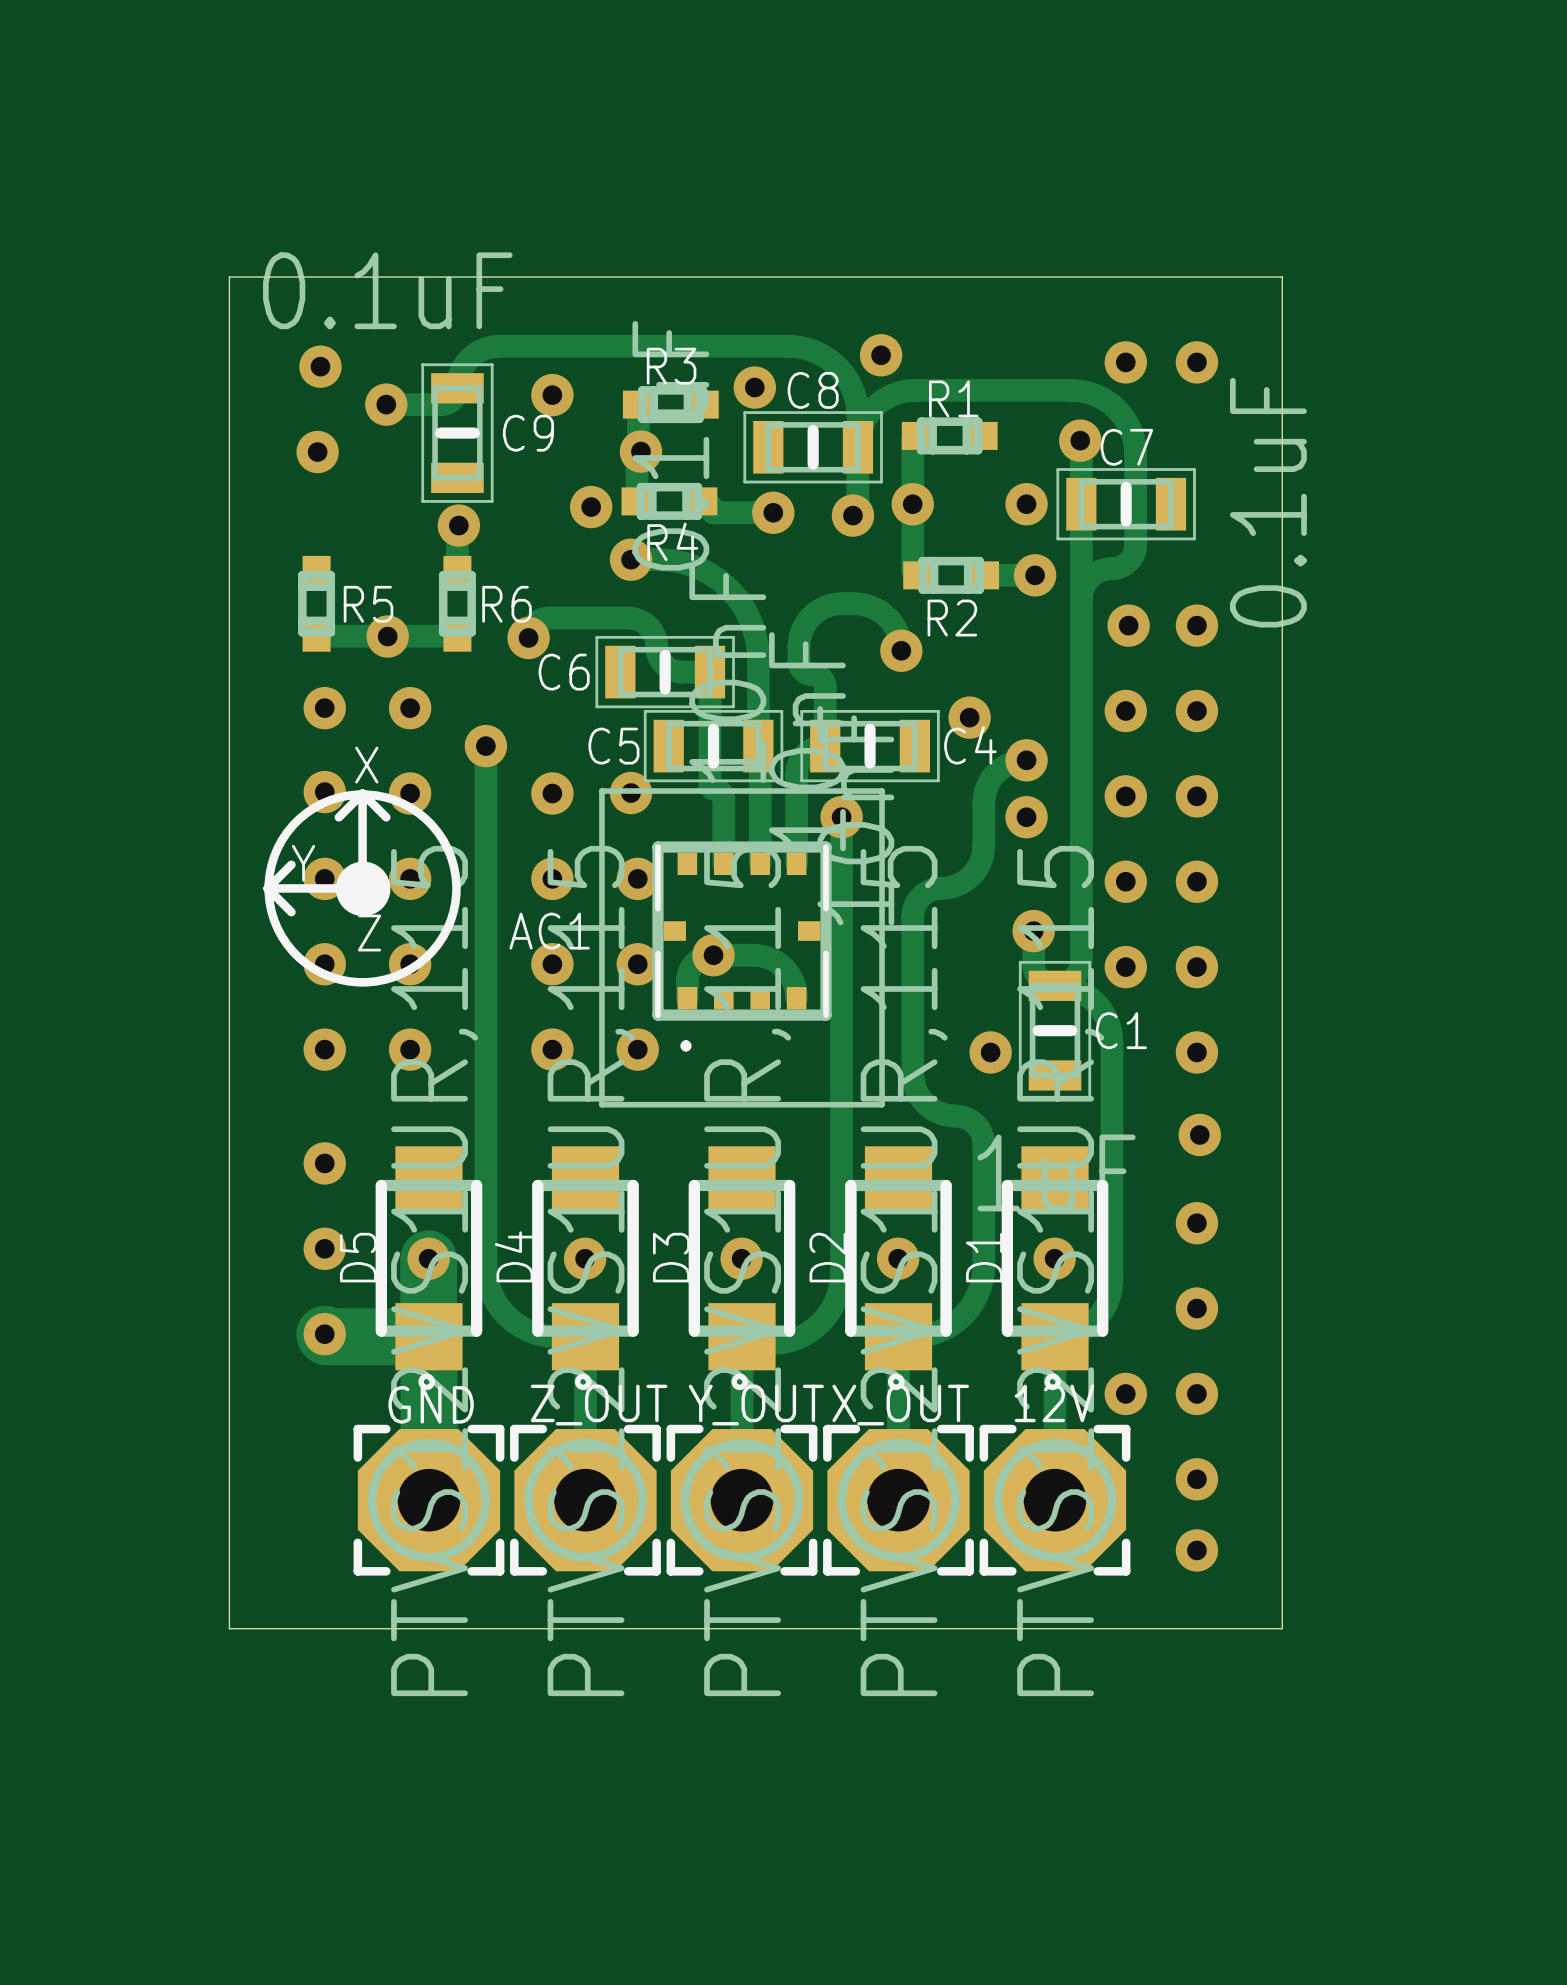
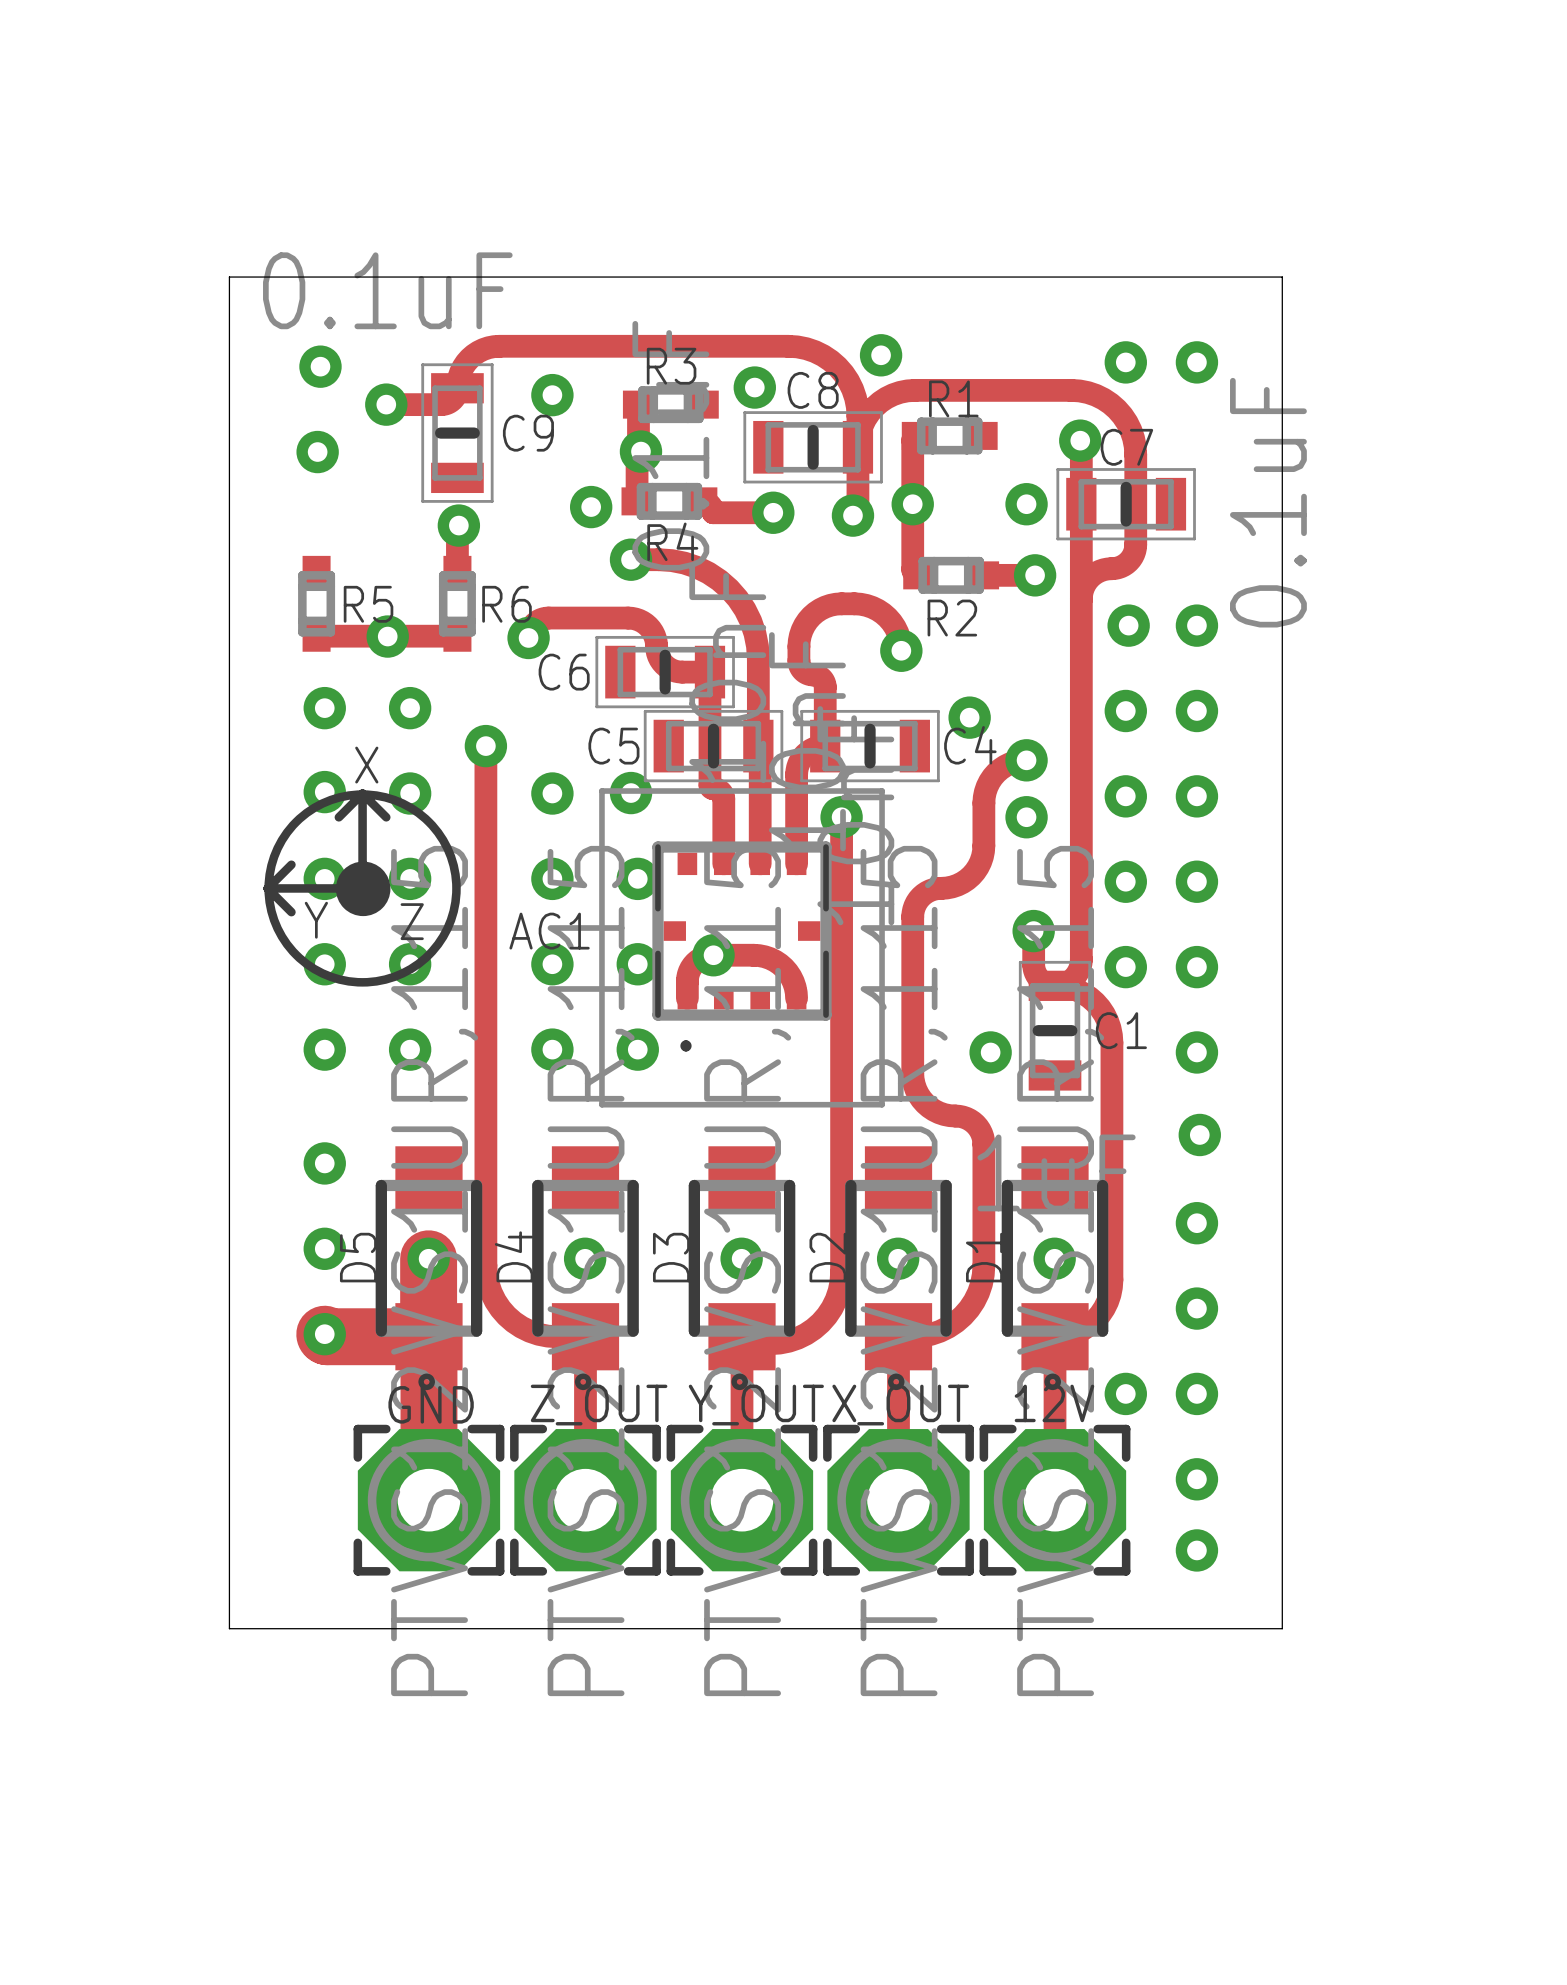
text position: Y (303, 863) -> Y (316, 920)
text position: Z (369, 933) -> Z (412, 921)

